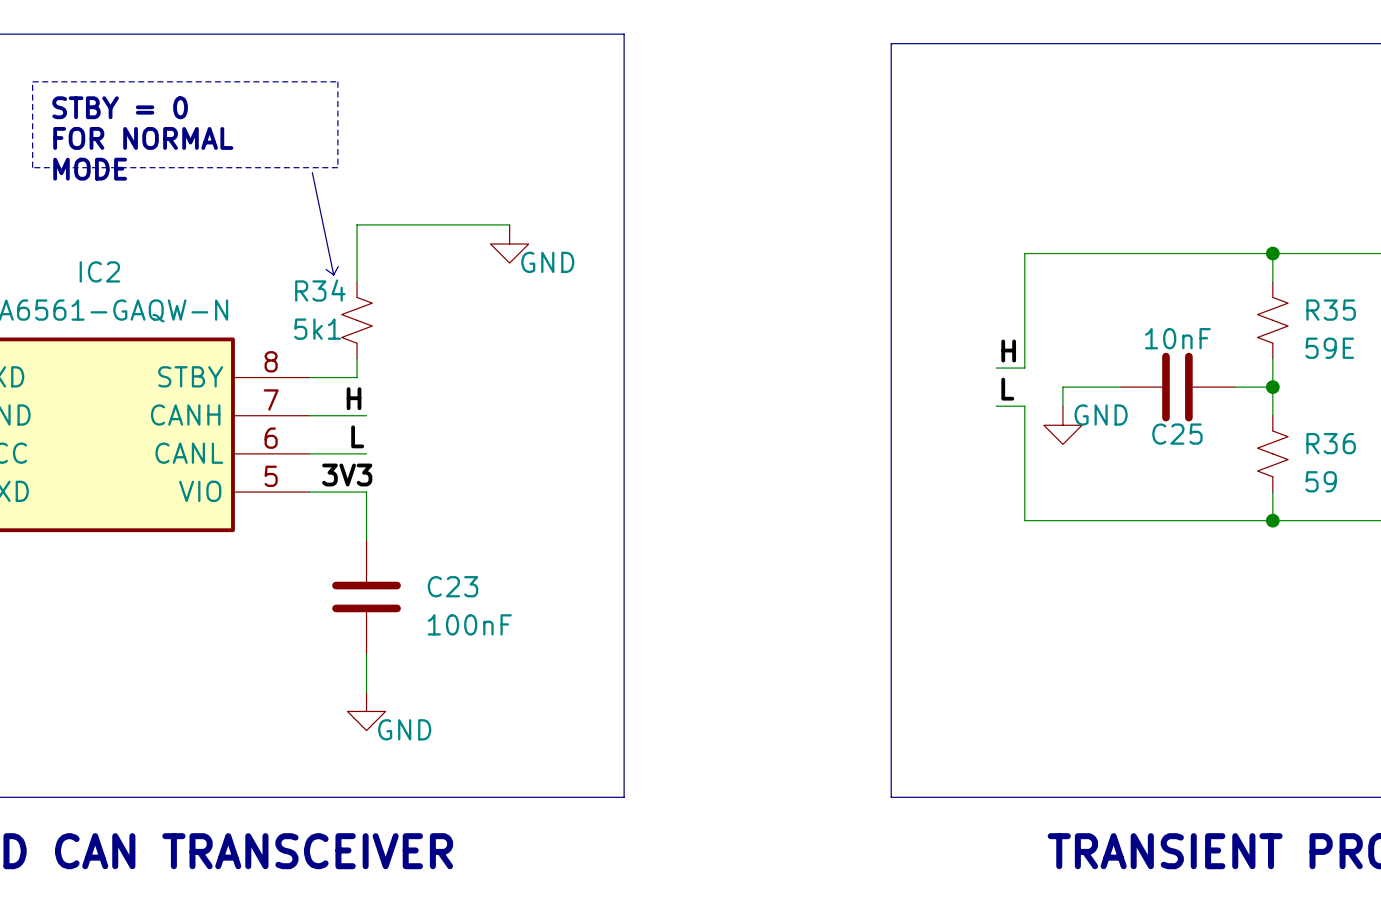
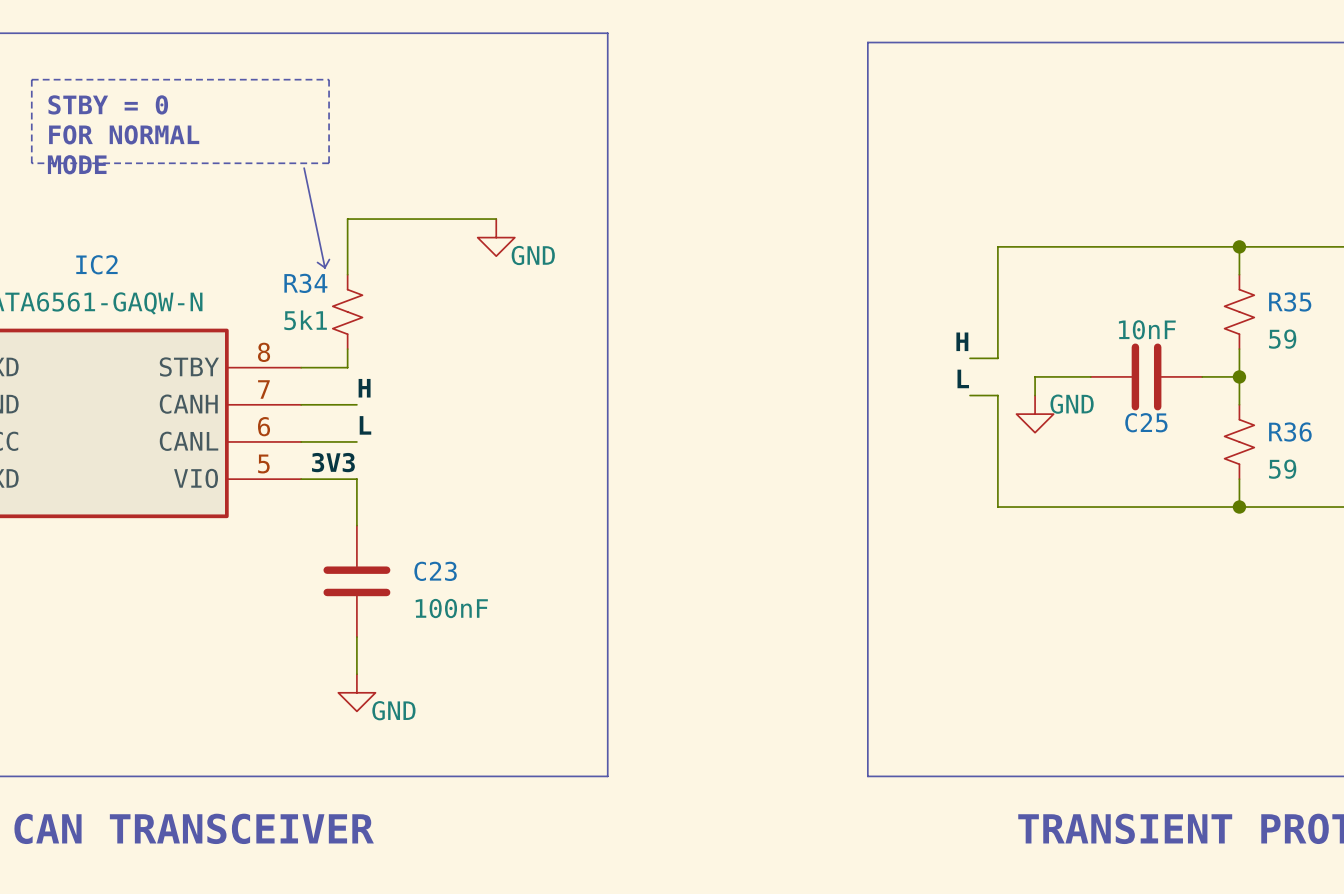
R35 value: 59E (1329, 348) -> 59 (1282, 339)
label position: H (1008, 351) -> H (962, 341)
label position: L (1007, 389) -> L (963, 378)
label position: H (354, 398) -> H (364, 388)
label position: L (357, 436) -> L (365, 425)

